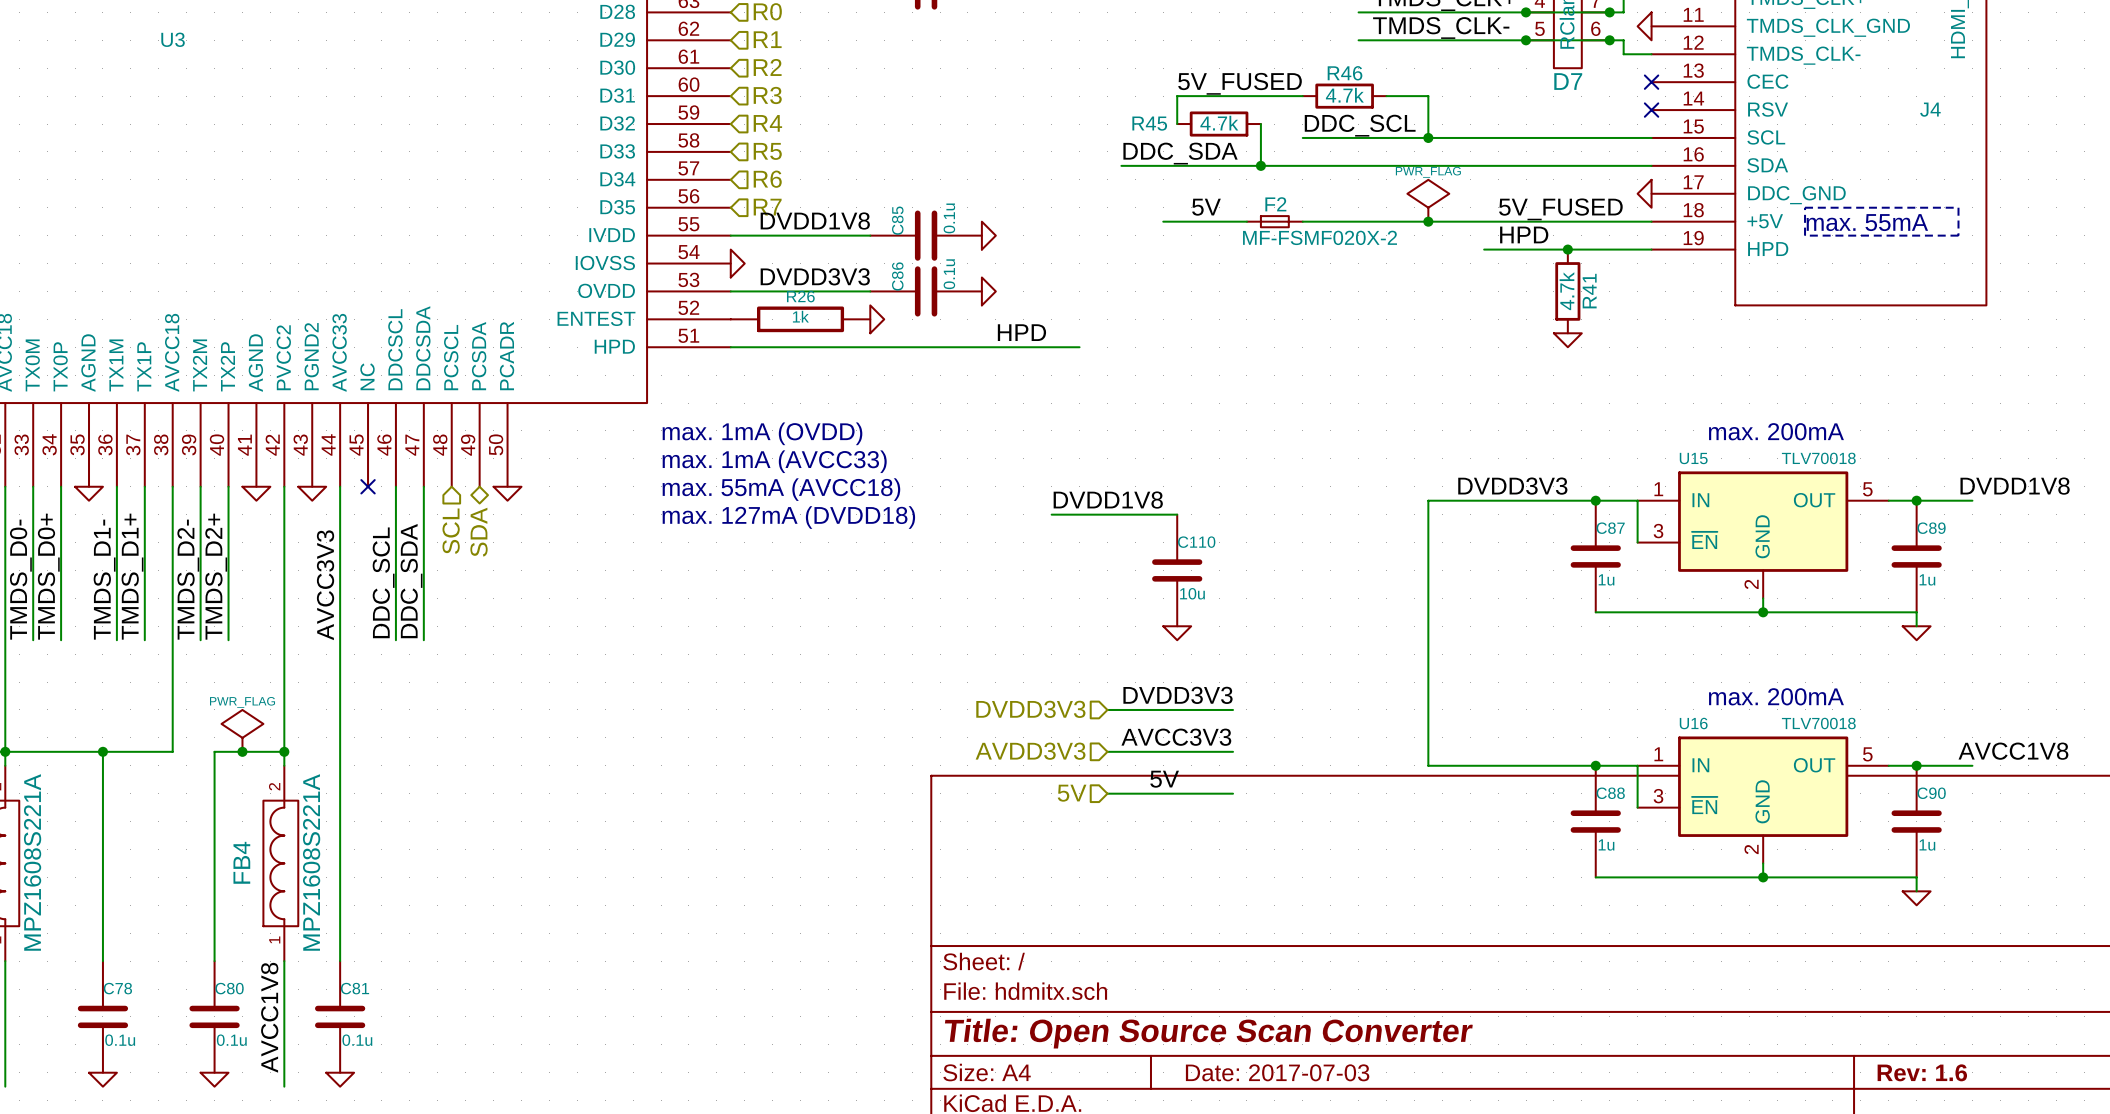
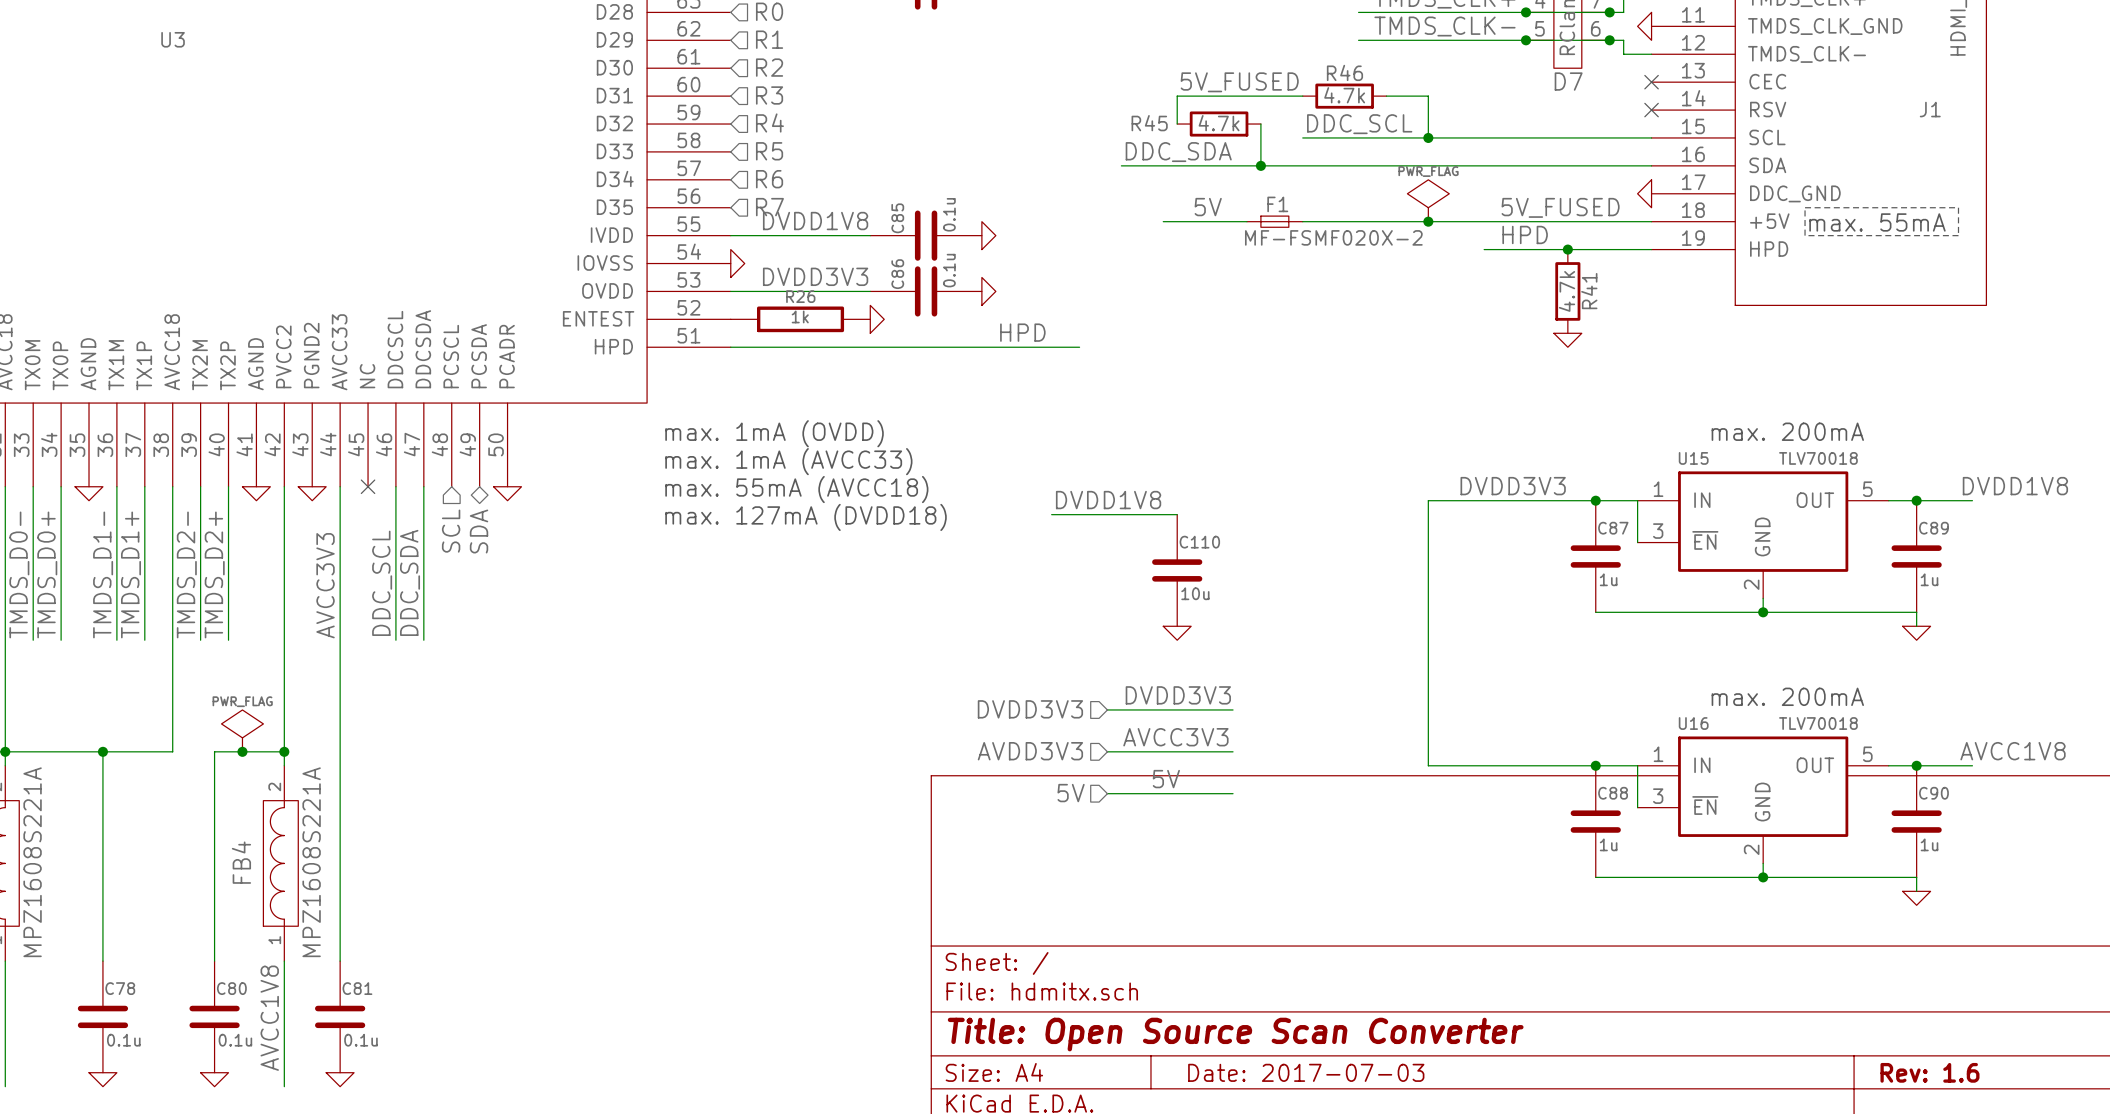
J4 name: J4 (1930, 109) -> J1 (1930, 109)
F2 name: F2 (1275, 204) -> F1 (1277, 204)

